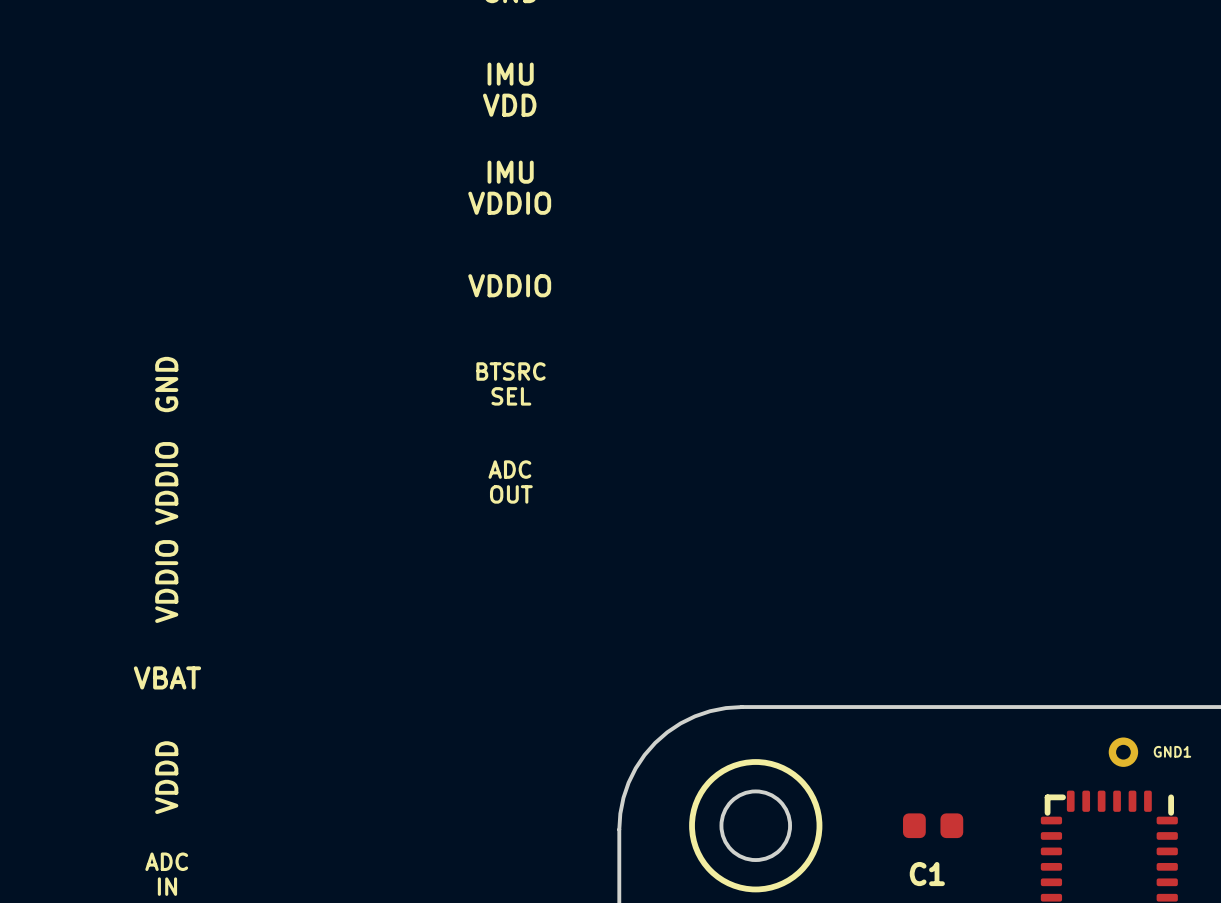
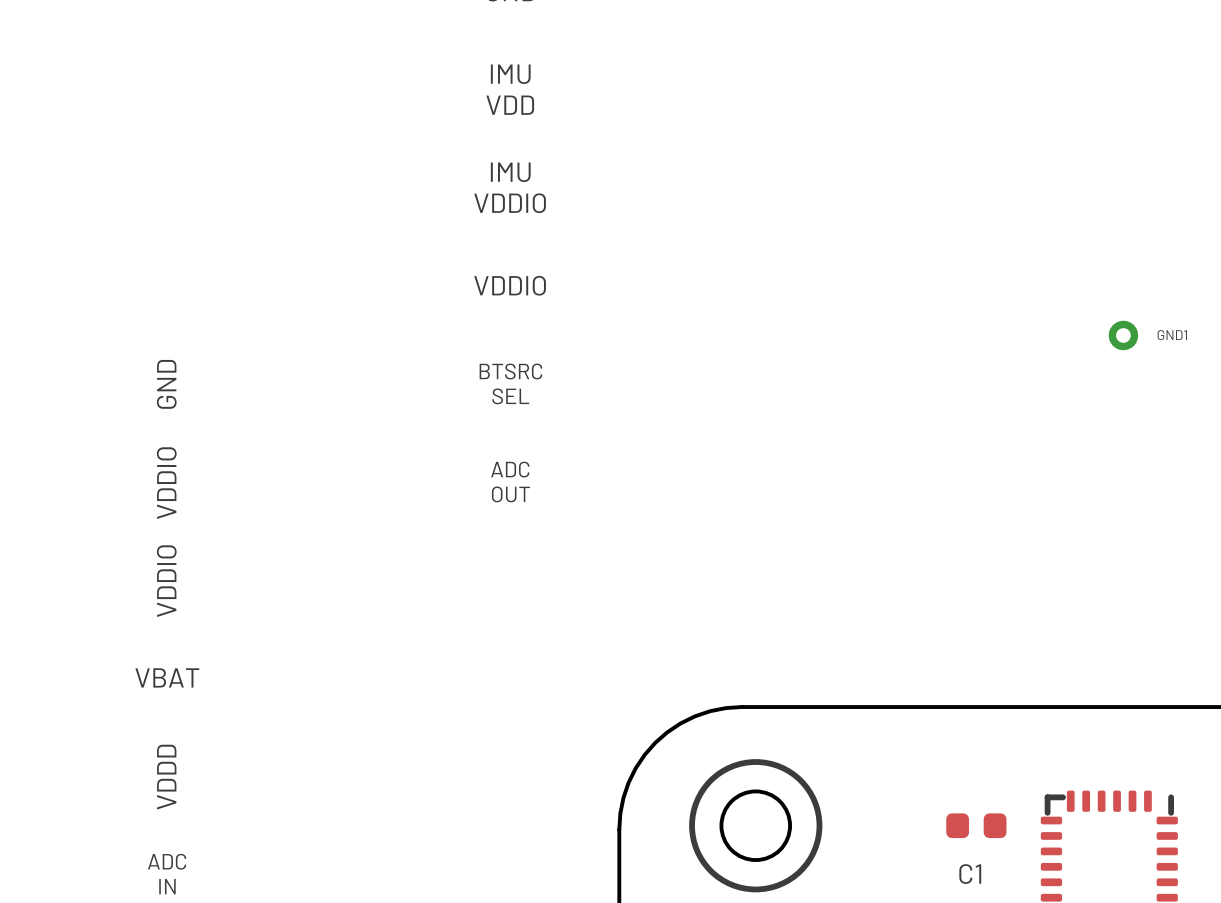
GND1 position: (1123, 752) -> (1123, 335)
C1 position: (933, 825) -> (976, 825)

